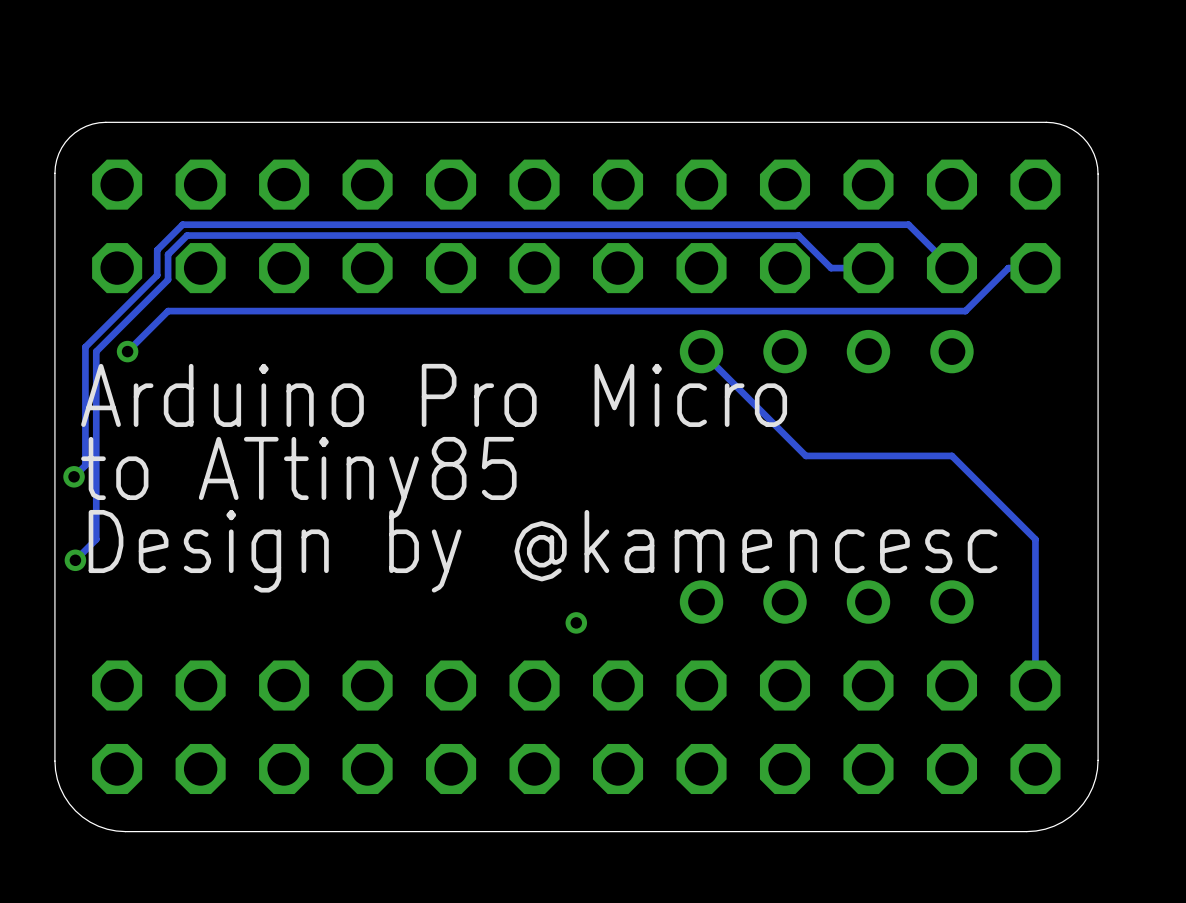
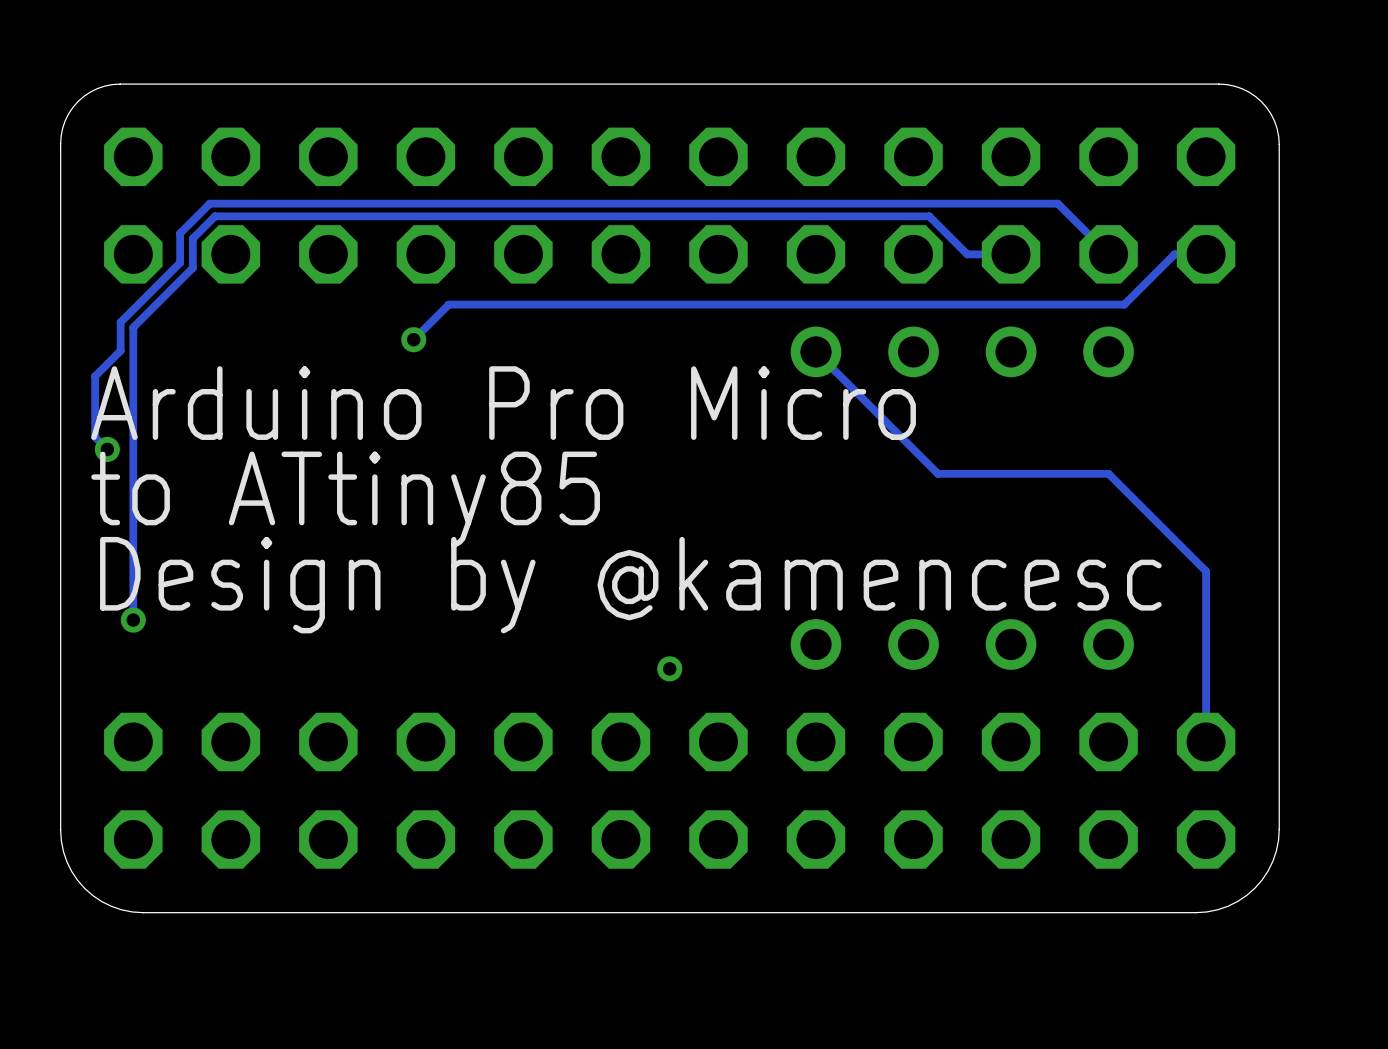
track: (387, 311) (168, 311) (127, 351) -> (448, 304) (413, 339)
track: (106, 326) (85, 347) (85, 465) (74, 476) -> (120, 322) (120, 350) (95, 376) (95, 437) (107, 449)
track: (117, 330) (96, 351) (96, 539) (75, 560) -> (133, 327) (133, 620)
via: none -> (413, 339)
via: (127, 351) -> none
via: none -> (107, 449)
via: (74, 476) -> none
via position: (75, 560) -> (133, 620)

